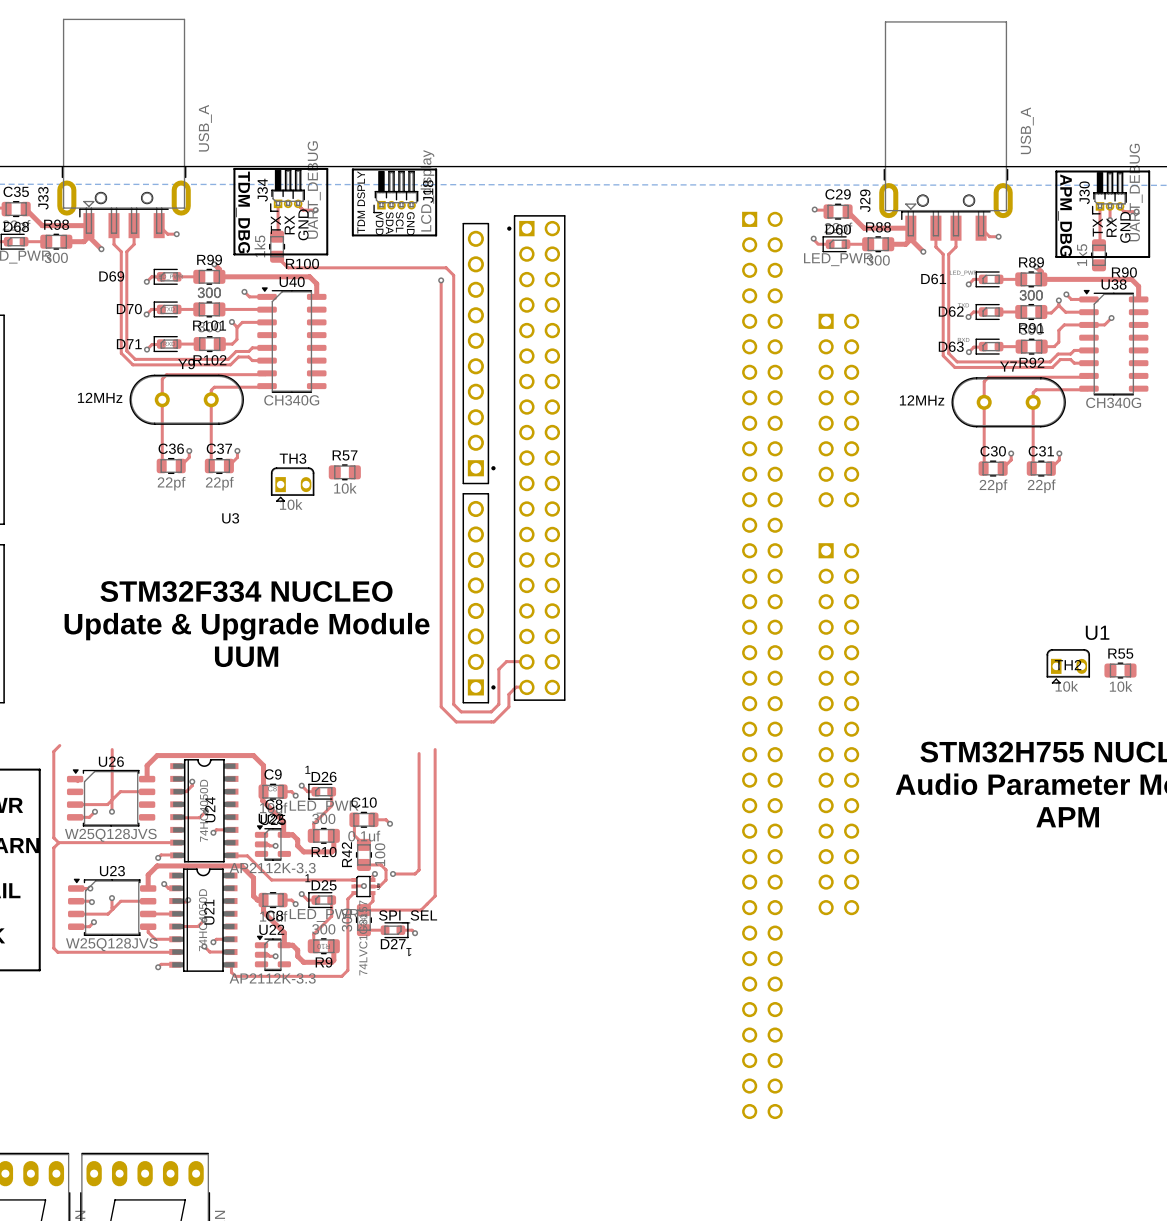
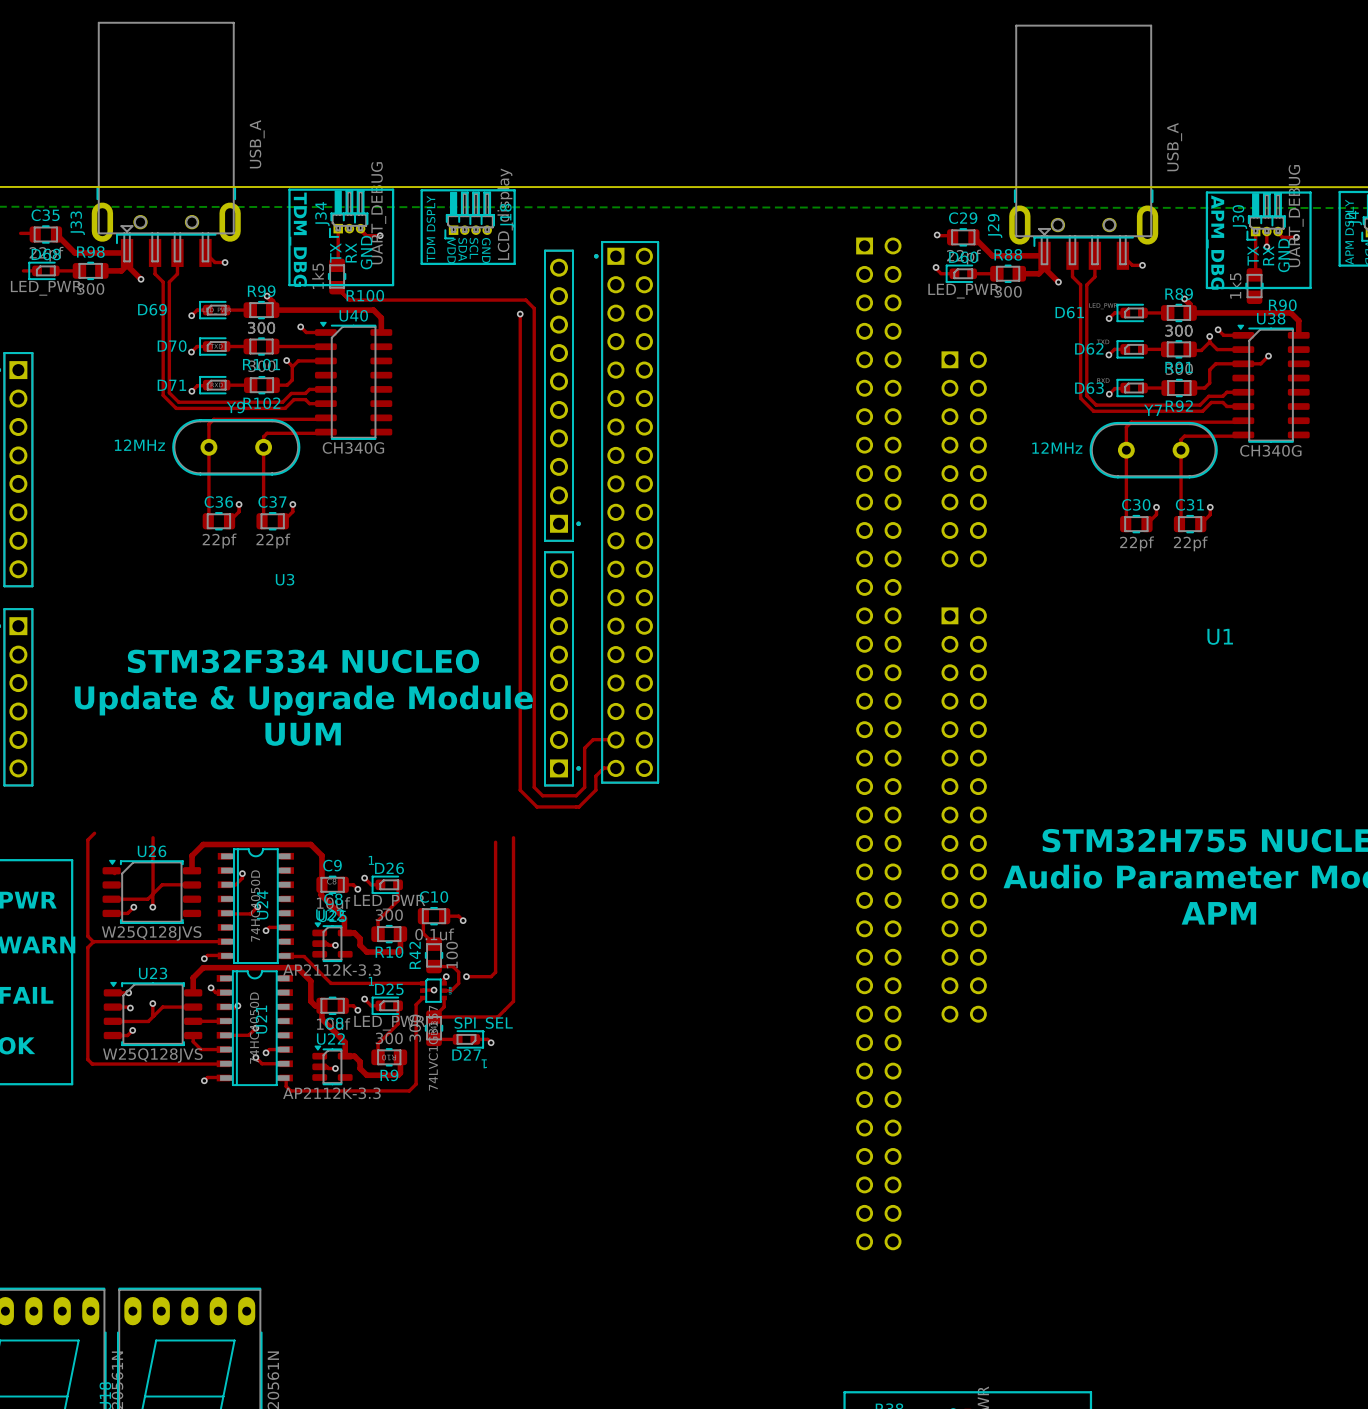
R57: 10k (344, 472) -> none
TH3: 10k (292, 484) -> none
U1 name position: U1 (1097, 632) -> U1 (1220, 636)
TH2: 10k (1068, 666) -> none
R55: 10k (1120, 670) -> none

